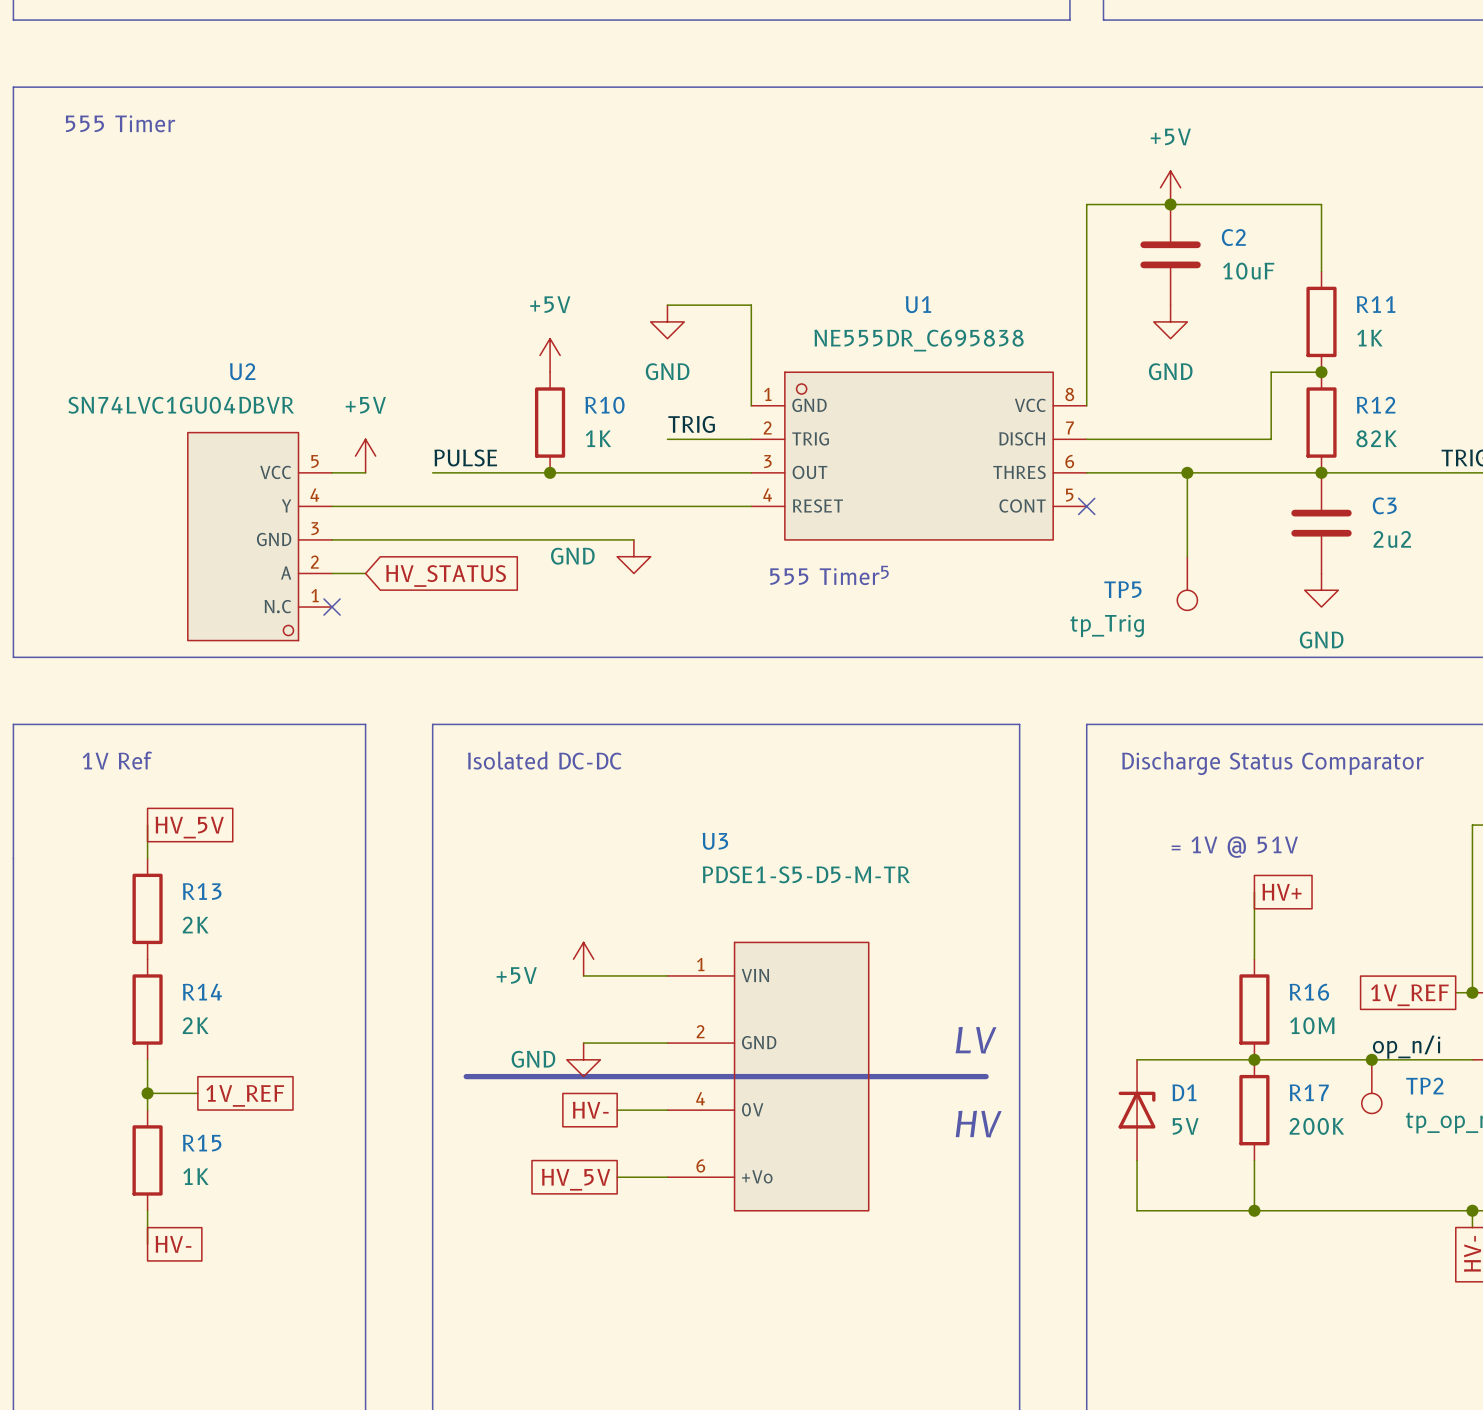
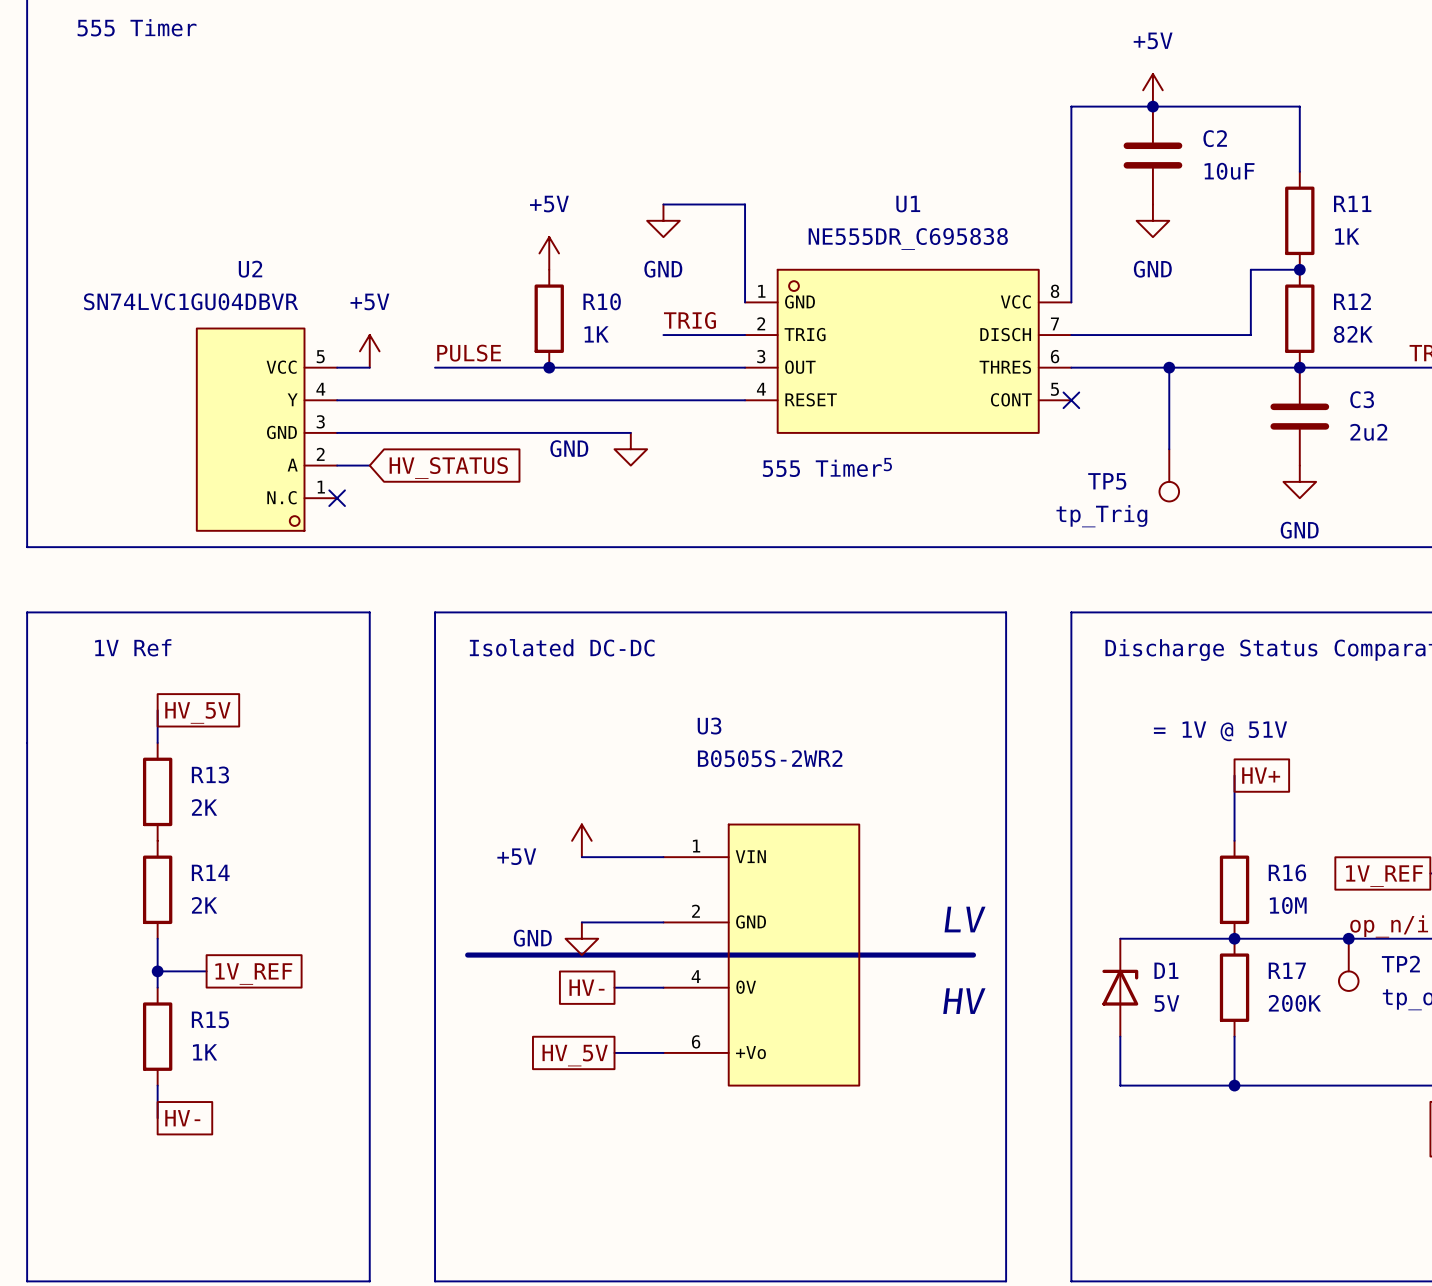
U3 value: PDSE1-S5-D5-M-TR (806, 874) -> B0505S-2WR2 (770, 758)

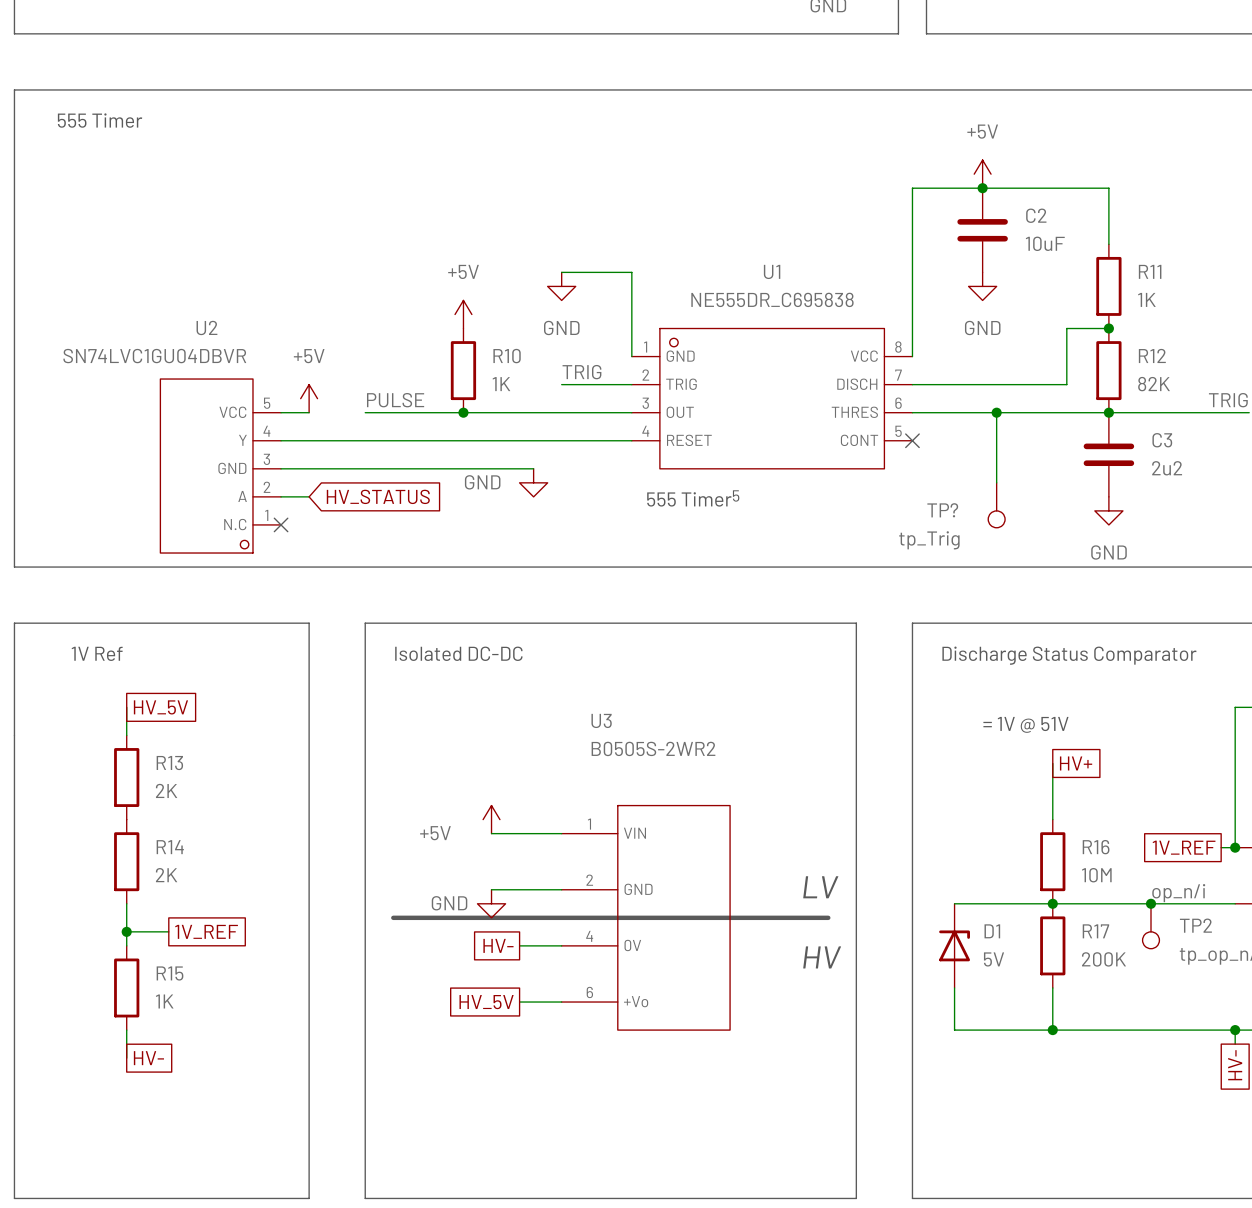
TP5 name: TP5 (1107, 481) -> TP? (942, 510)

